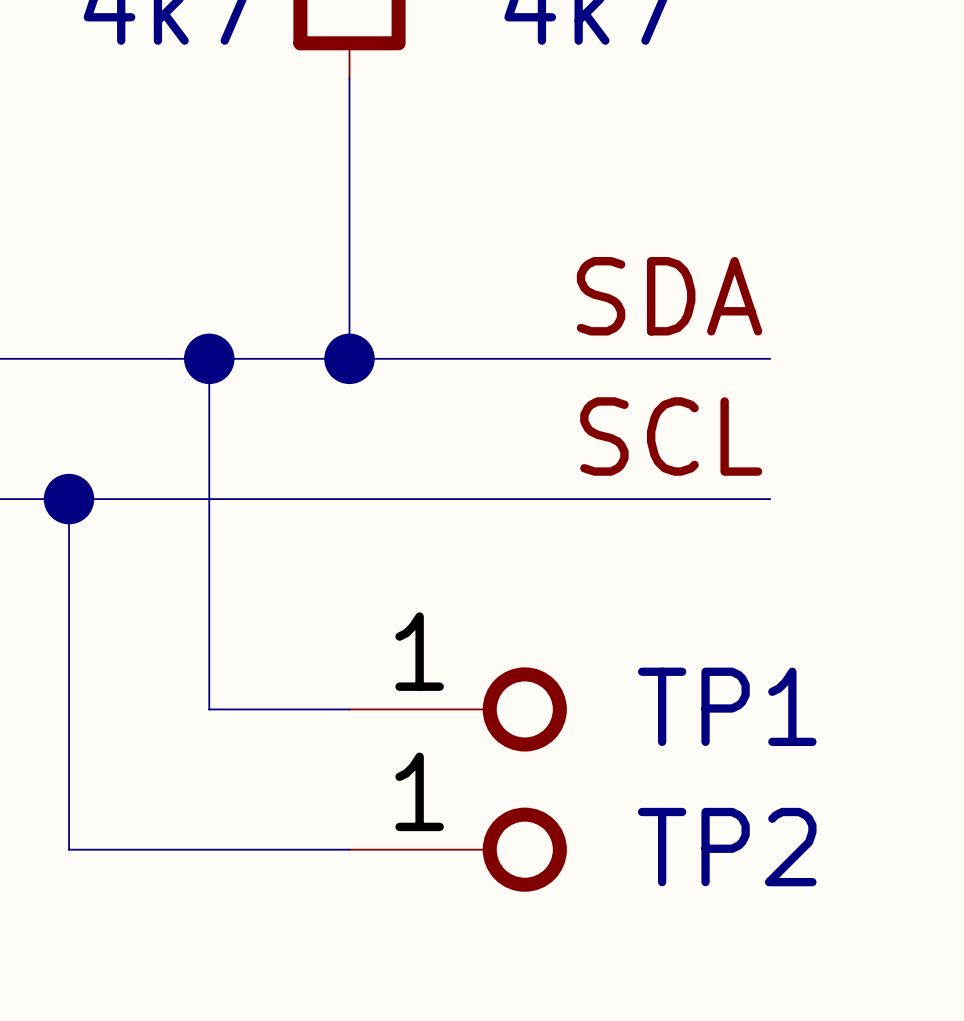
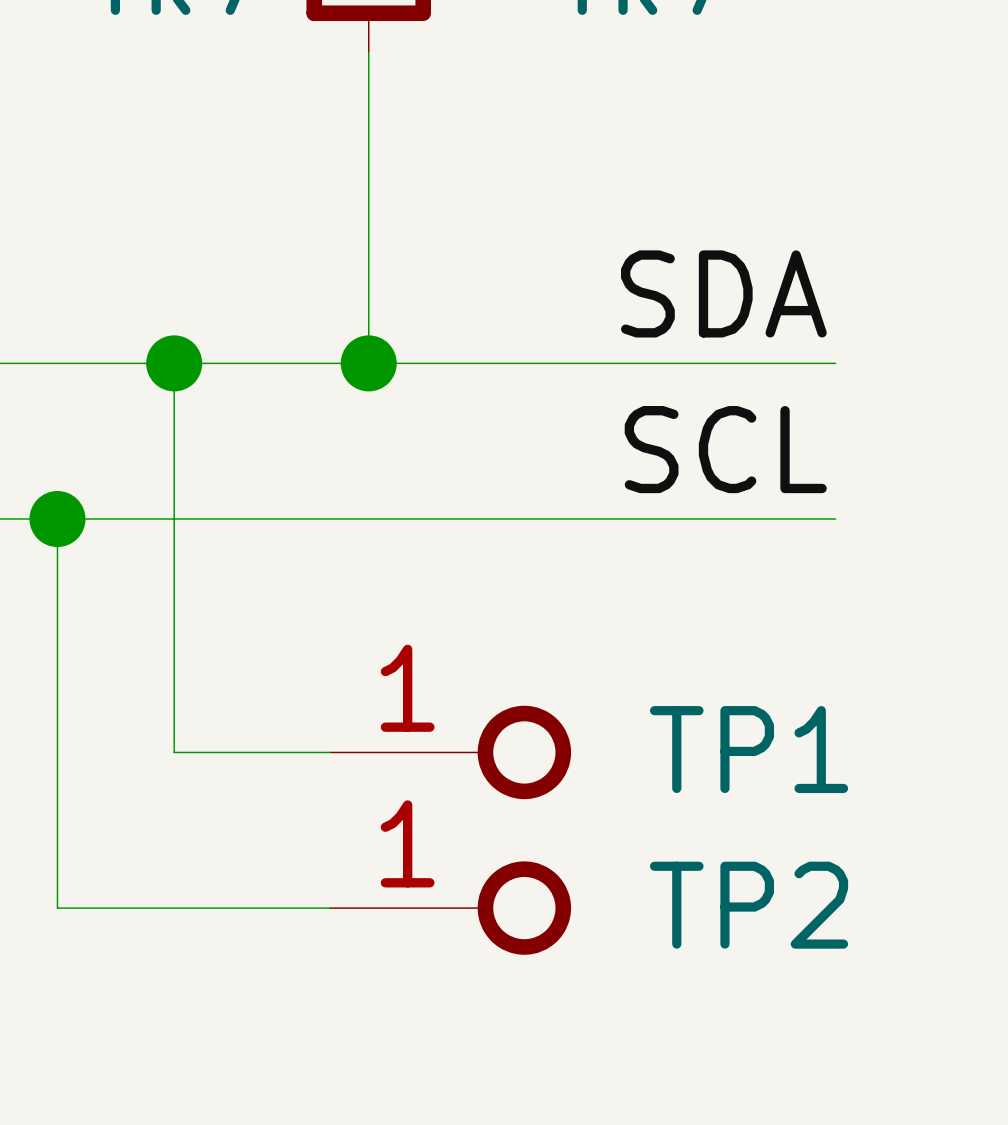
wire: (209, 358) (209, 709) -> (174, 363) (174, 752) (213, 752)
junction position: (209, 358) -> (174, 363)
TP1 position: (458, 709) -> (450, 752)
TP2 position: (458, 849) -> (450, 908)

